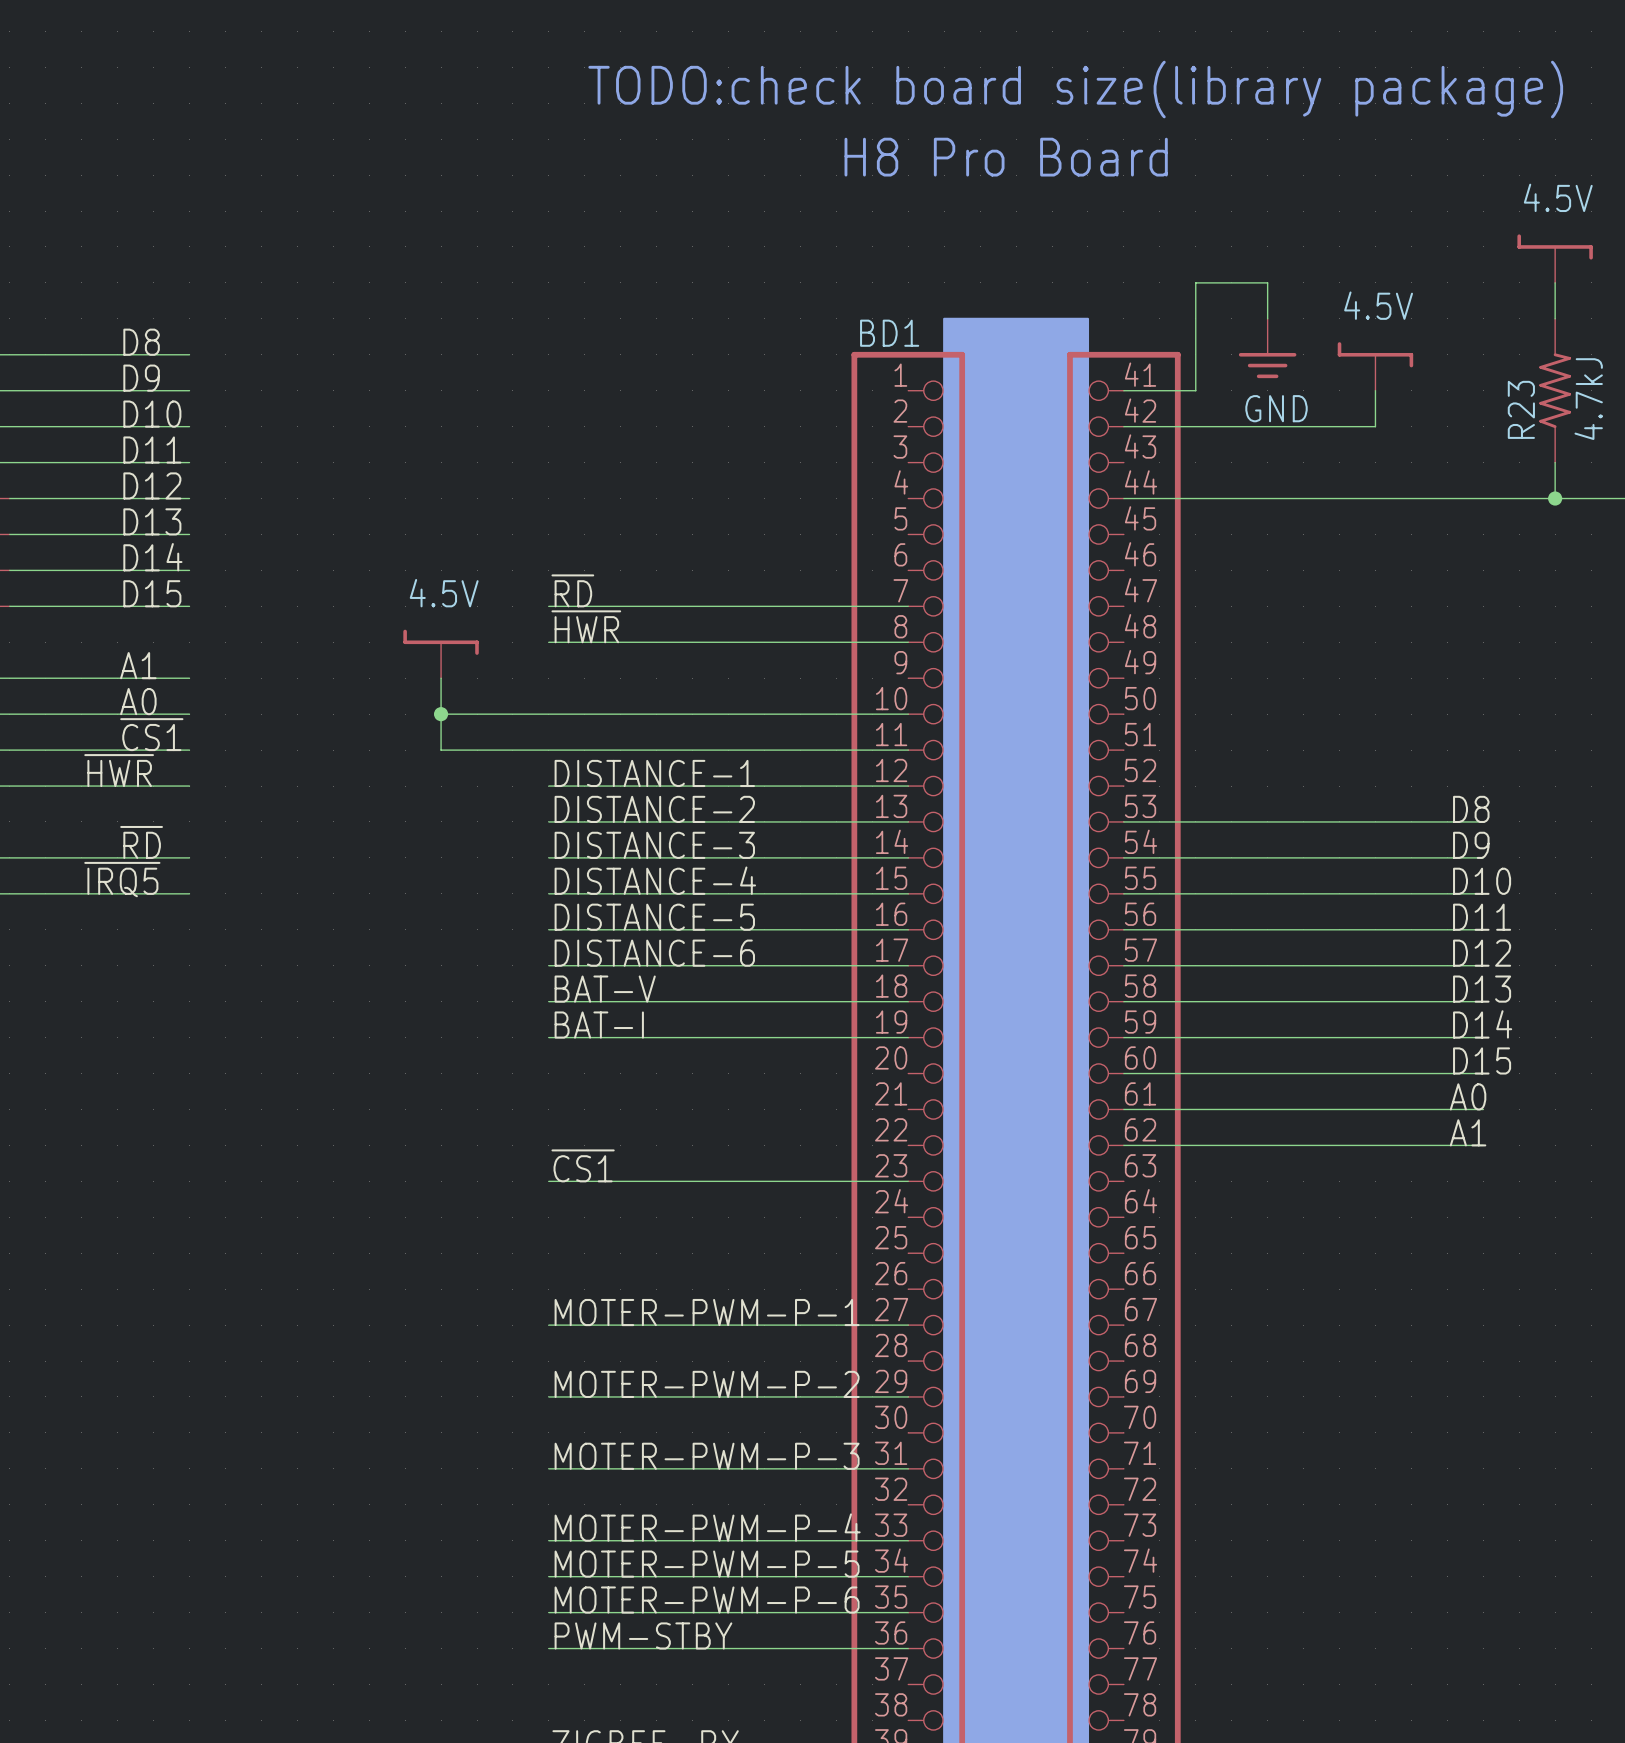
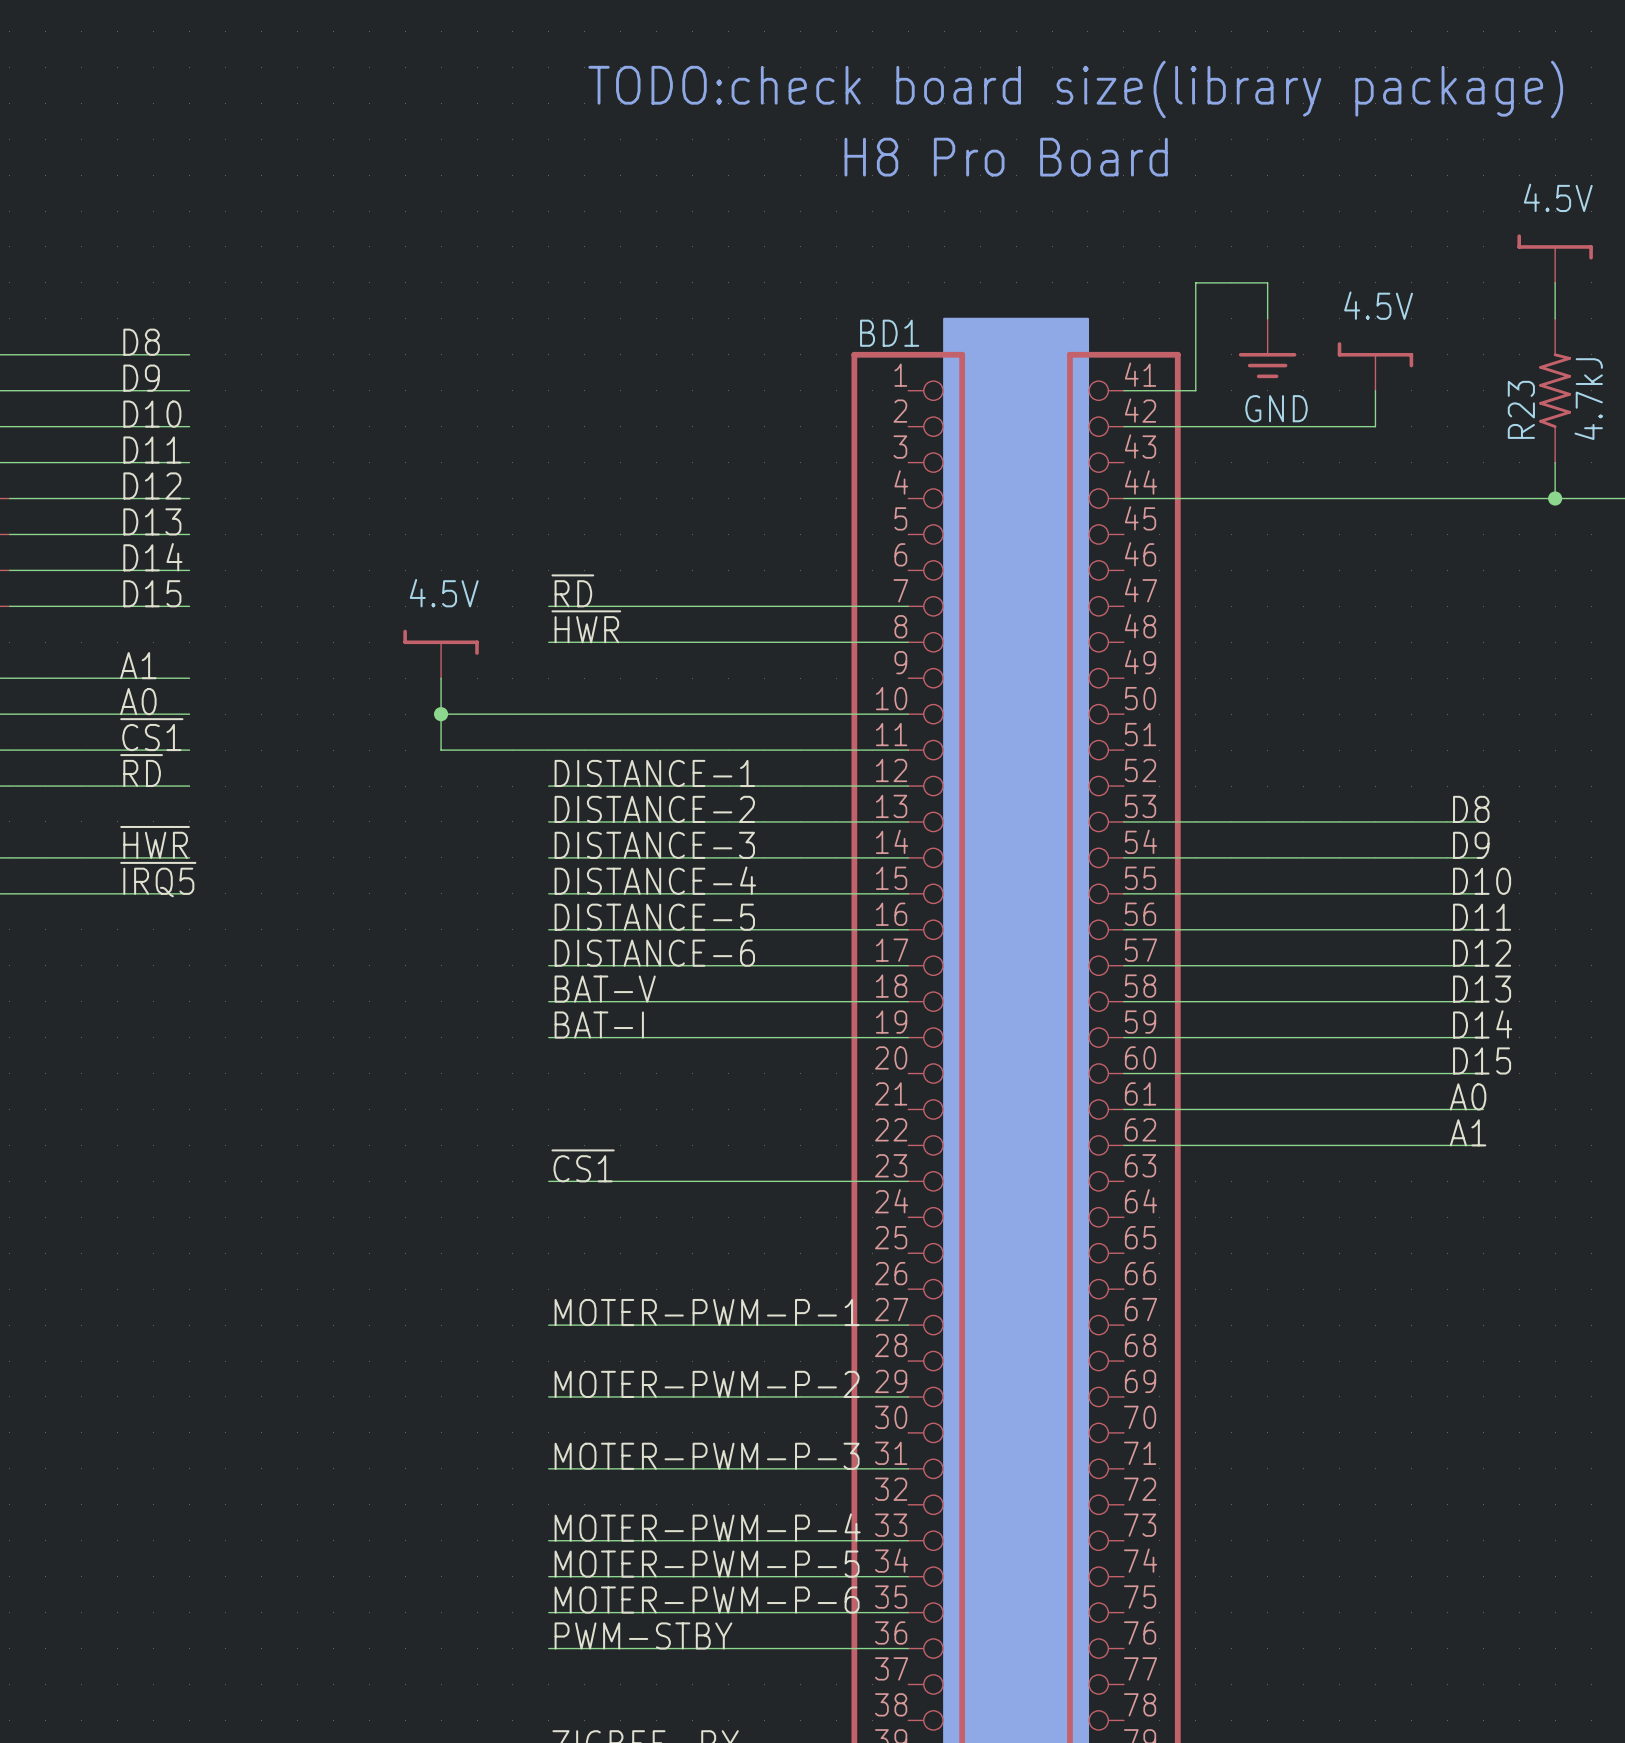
label: ~{HWR} (119, 770) -> ~{RD} (141, 770)
label: ~{RD} (141, 842) -> ~{HWR} (155, 842)
label position: ~{IRQ5} (122, 879) -> ~{IRQ5} (158, 879)

